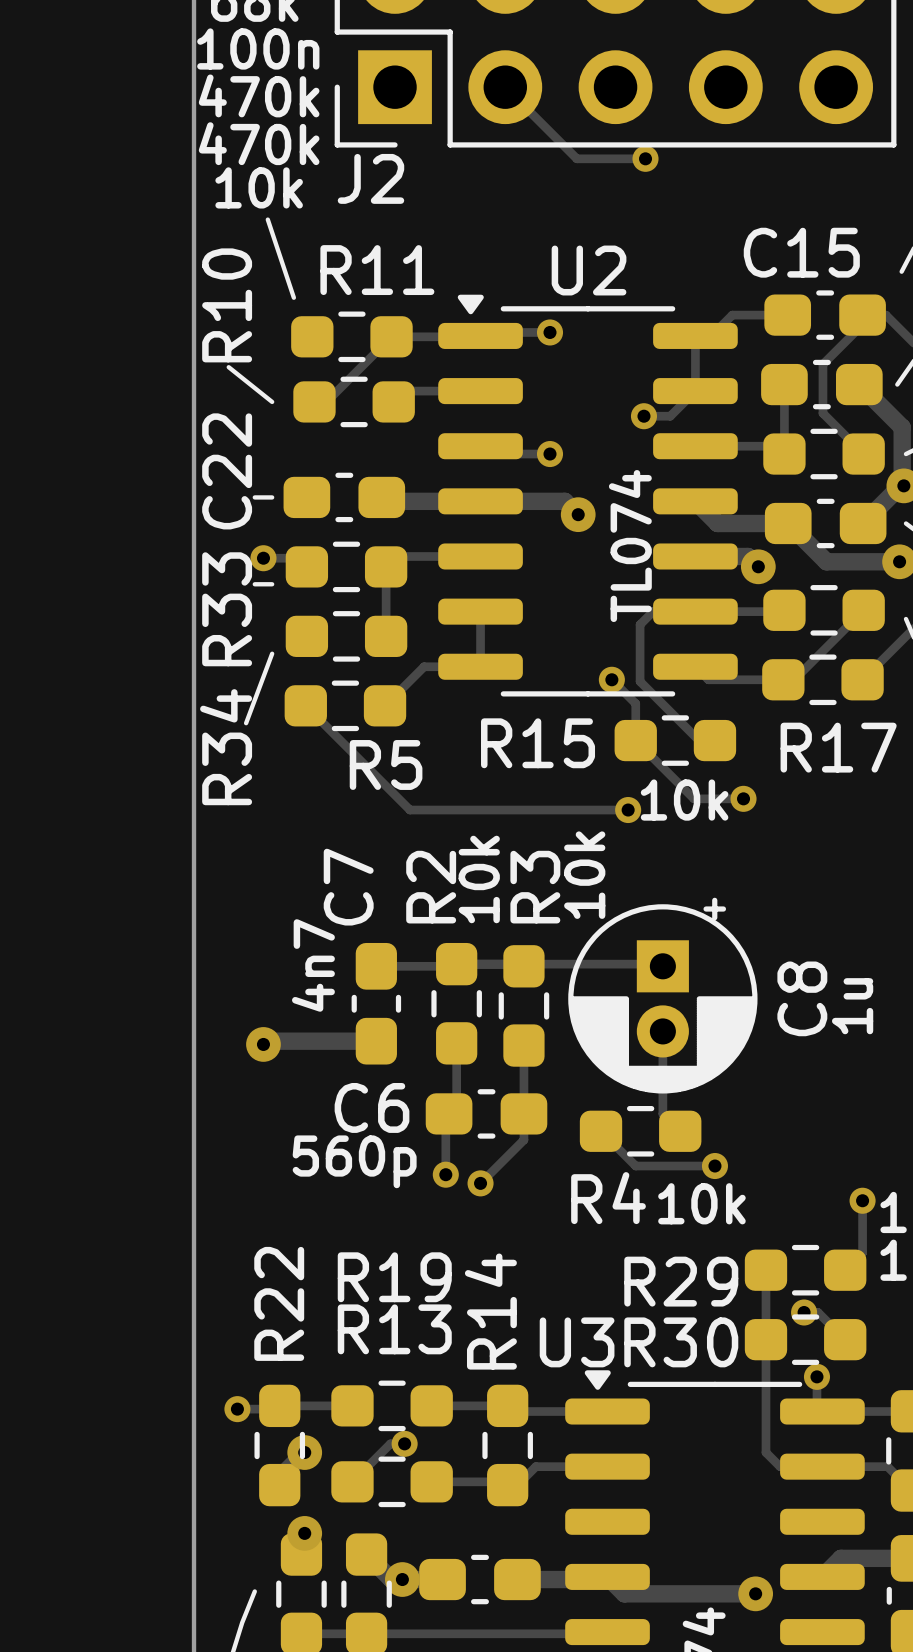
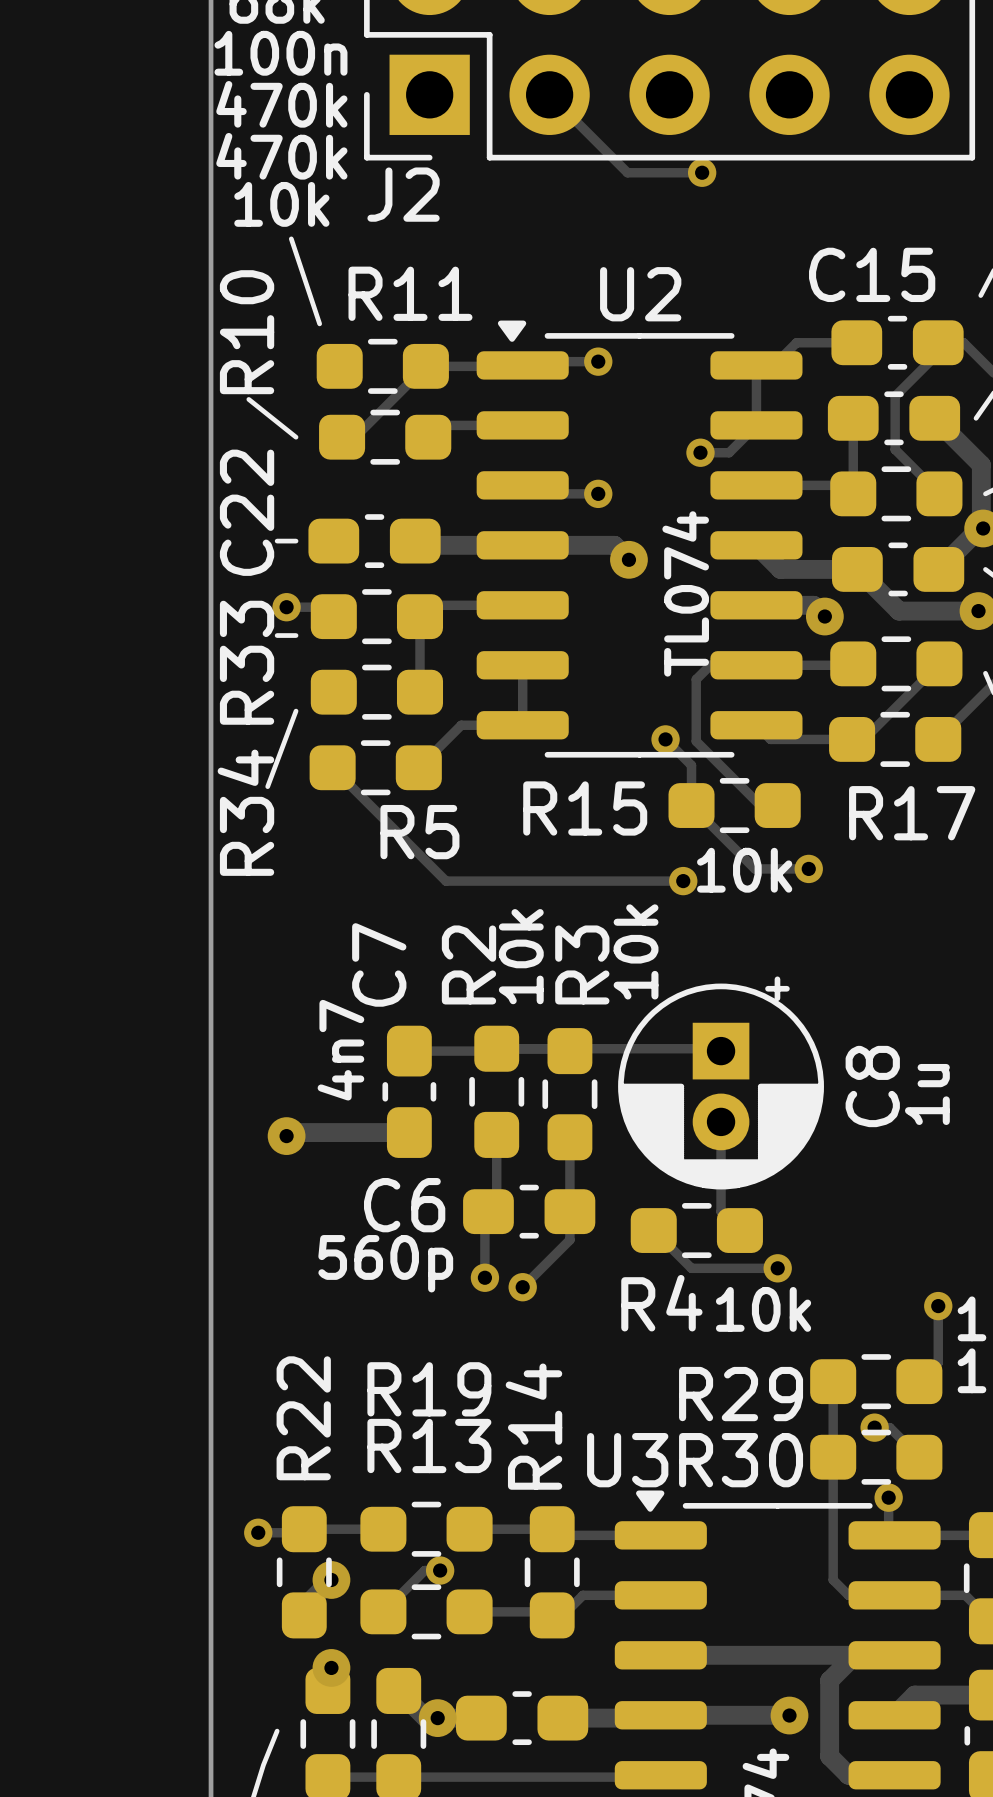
track: none -> (660, 1655) (894, 1655)
track: none -> (854, 1655) (829, 1680) (829, 1756) (848, 1775) (894, 1775)
track: (607, 1576) (624, 1593) (755, 1593) -> (660, 1715) (789, 1715)
via position: (755, 1593) -> (789, 1715)

